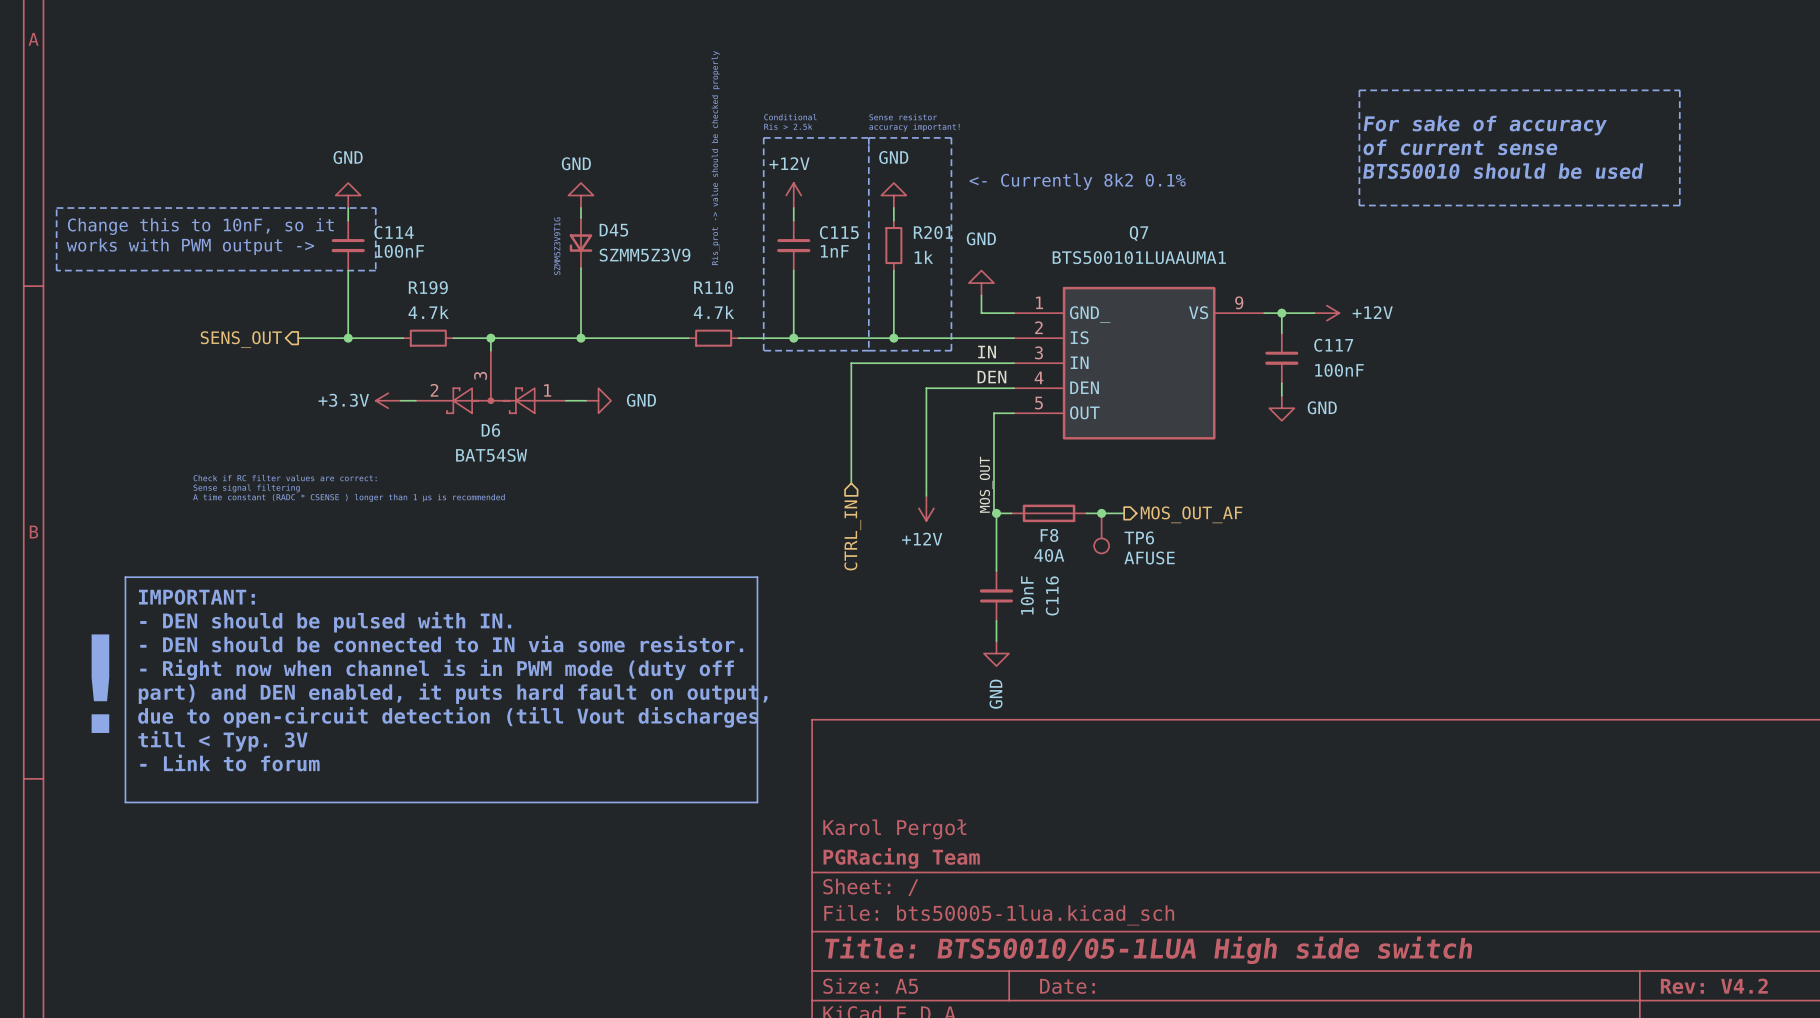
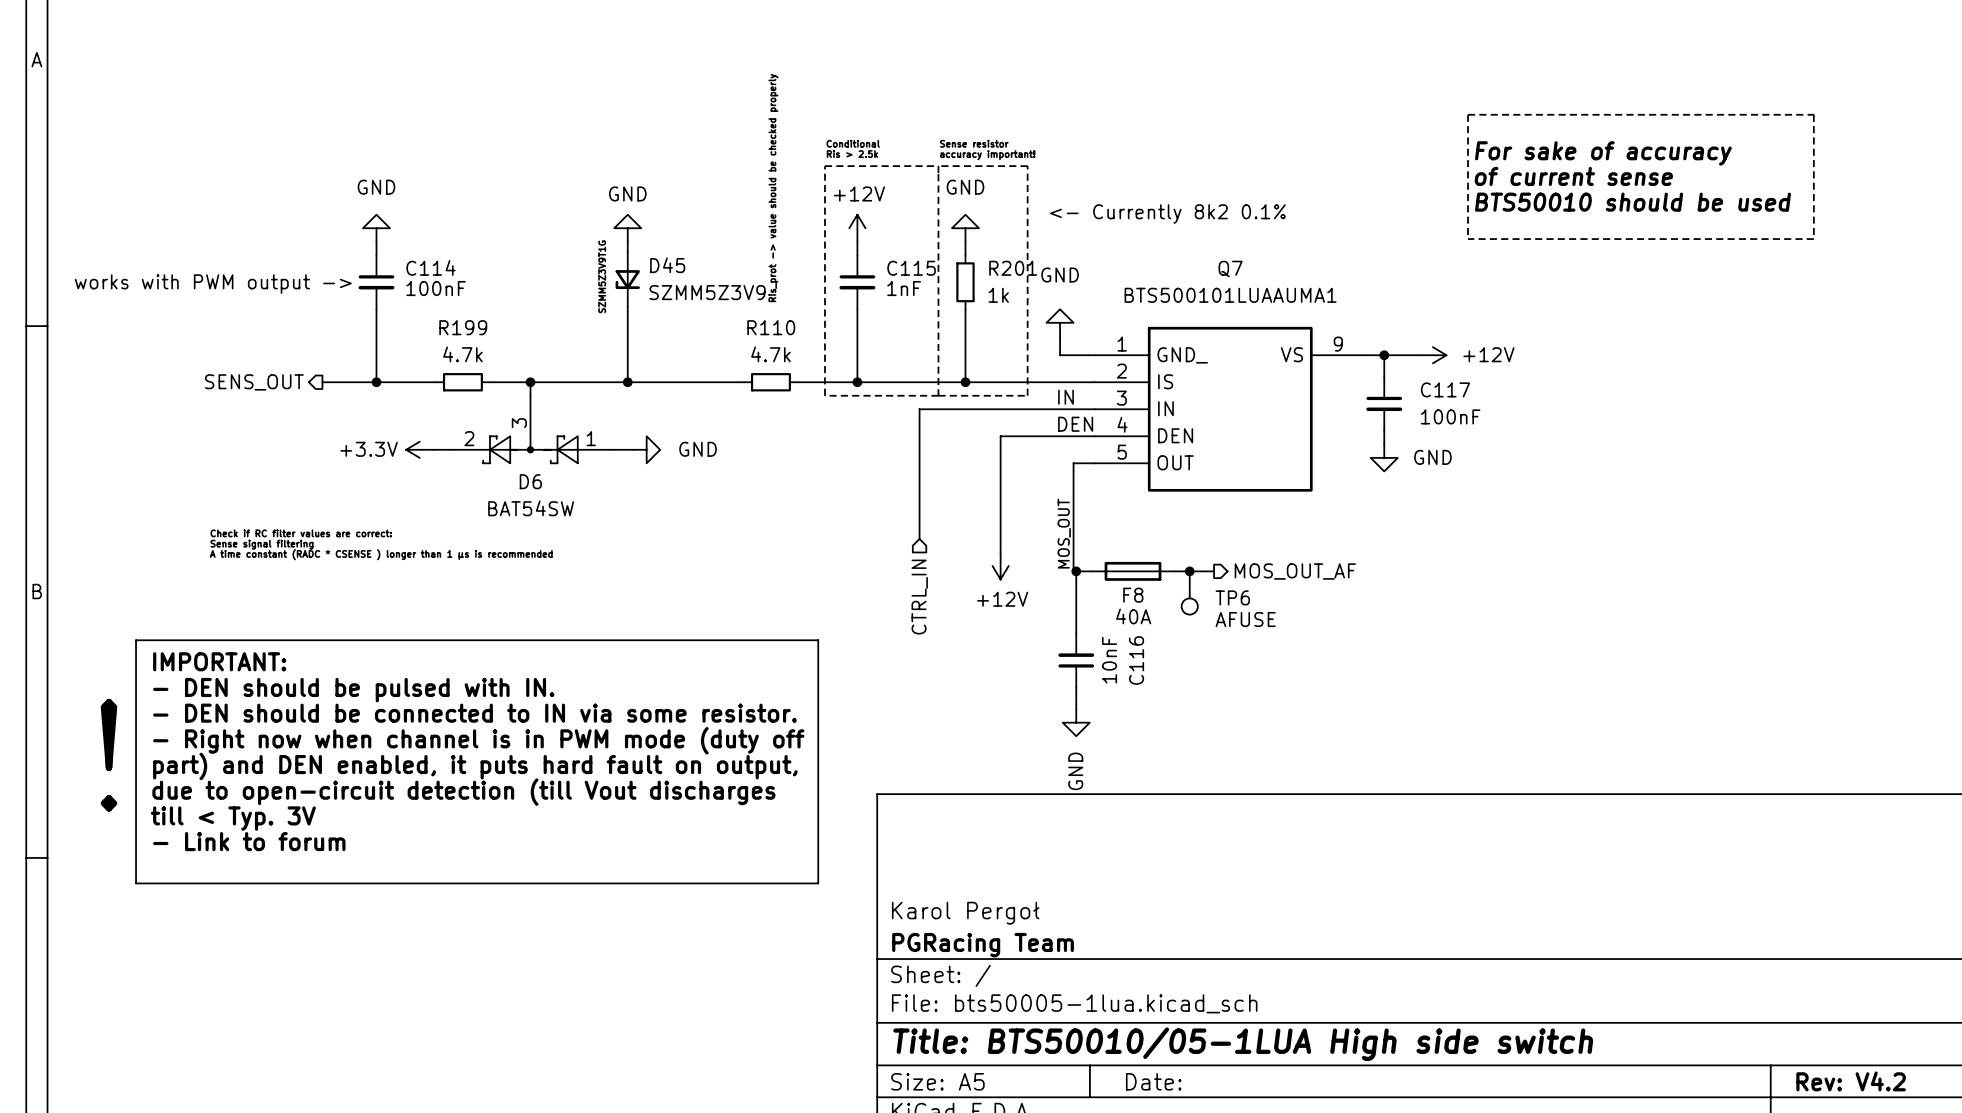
line: (56, 208) (375, 208) (375, 270) (56, 270) (56, 208) -> none
text: Change this to 10nF, so it (200, 226) -> none

